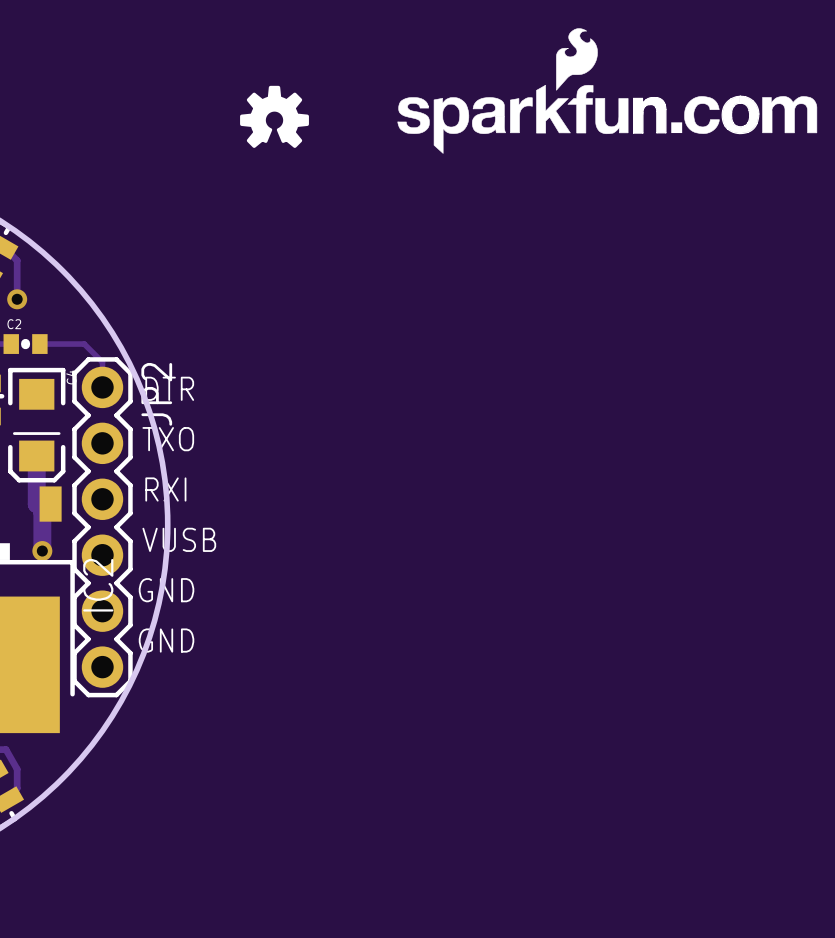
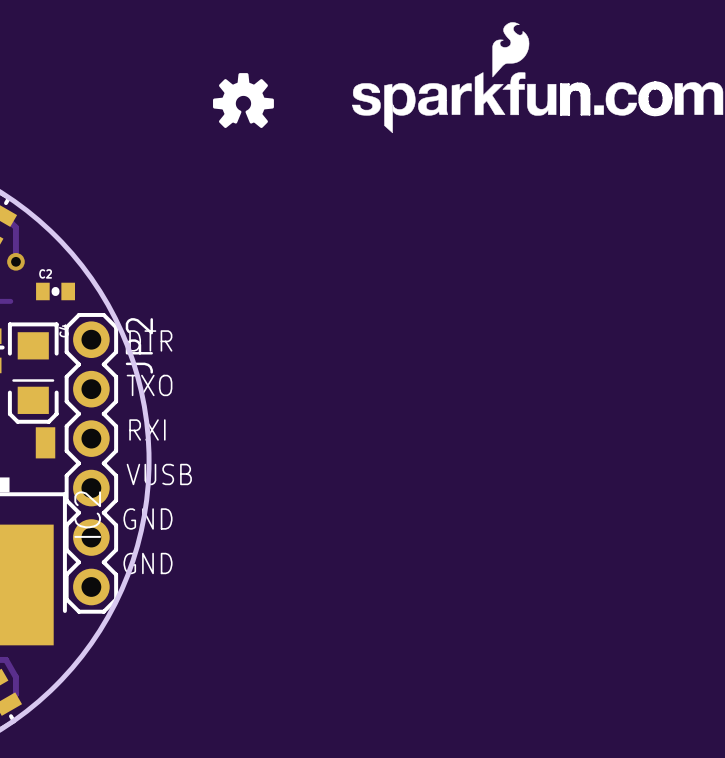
C2 position: (25, 344) -> (55, 291)
track: (39, 344) (84, 344) (102, 362) (102, 387) -> none
track: (36, 455) (36, 504) (50, 504) (42, 512) (42, 551) -> none
via: (42, 551) -> none

